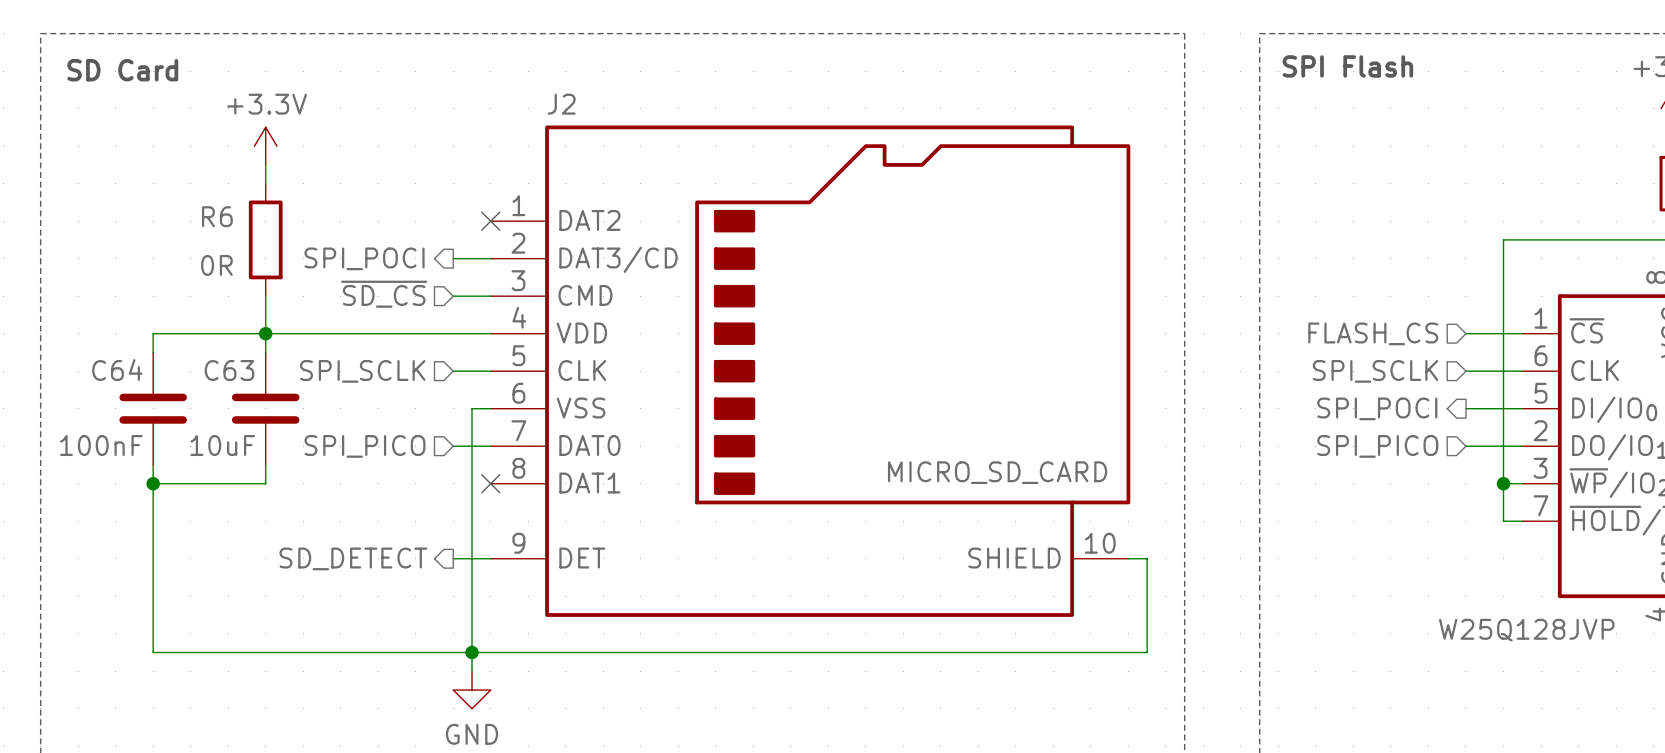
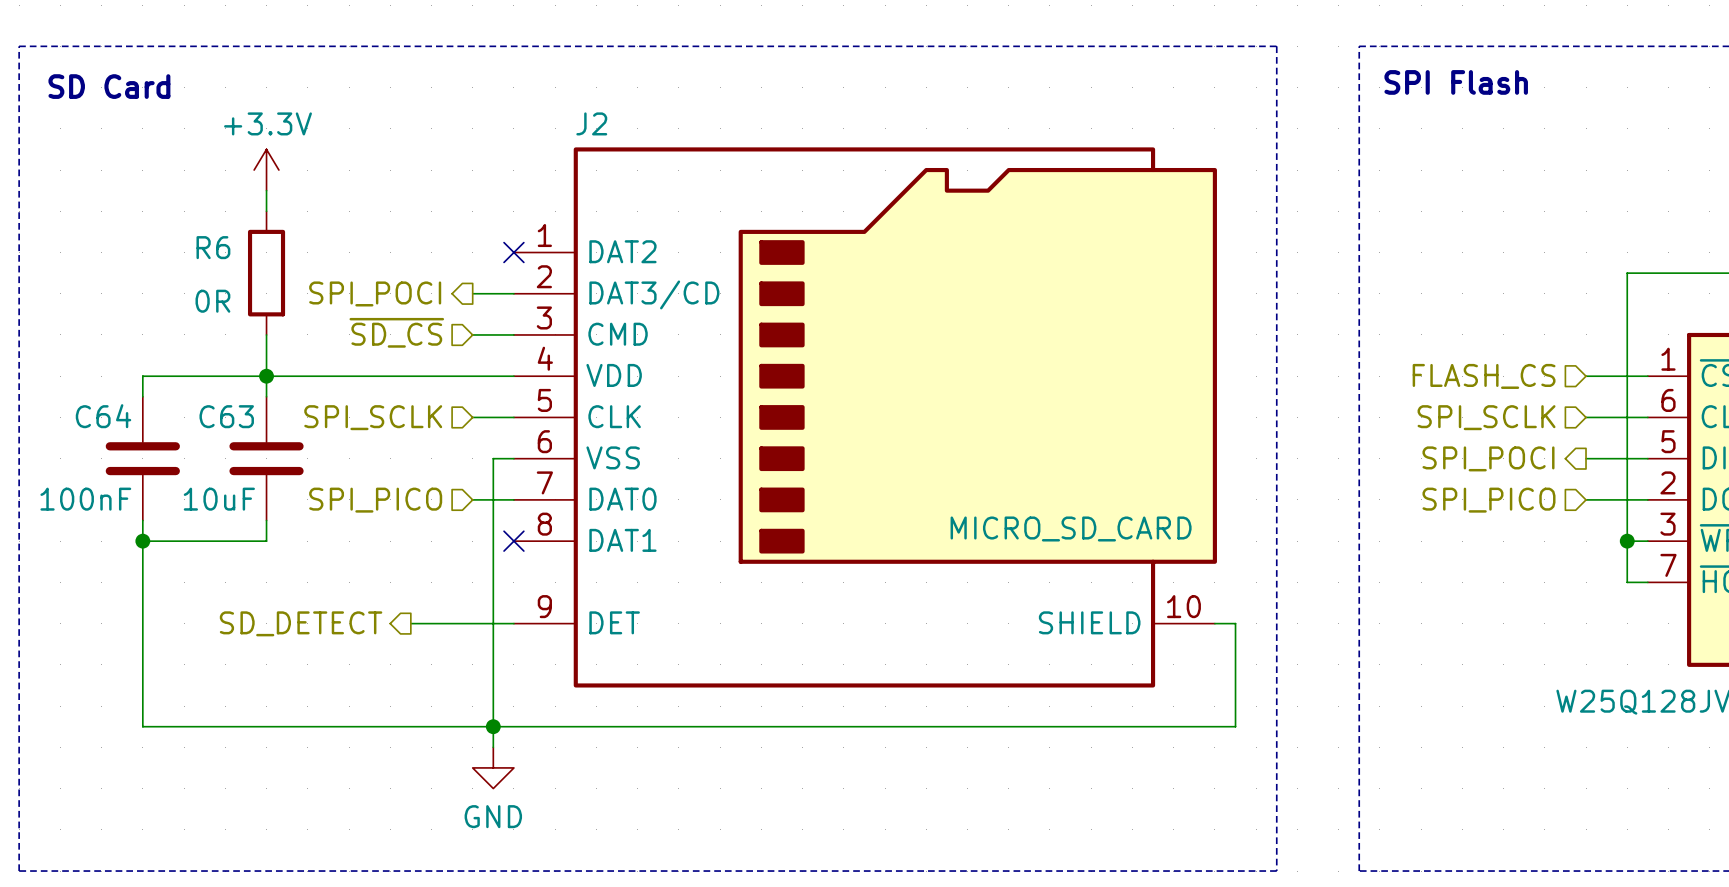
hierarchical label position: SD_DETECT (353, 558) -> SD_DETECT (301, 623)
wire: none -> (410, 623) (472, 623)

